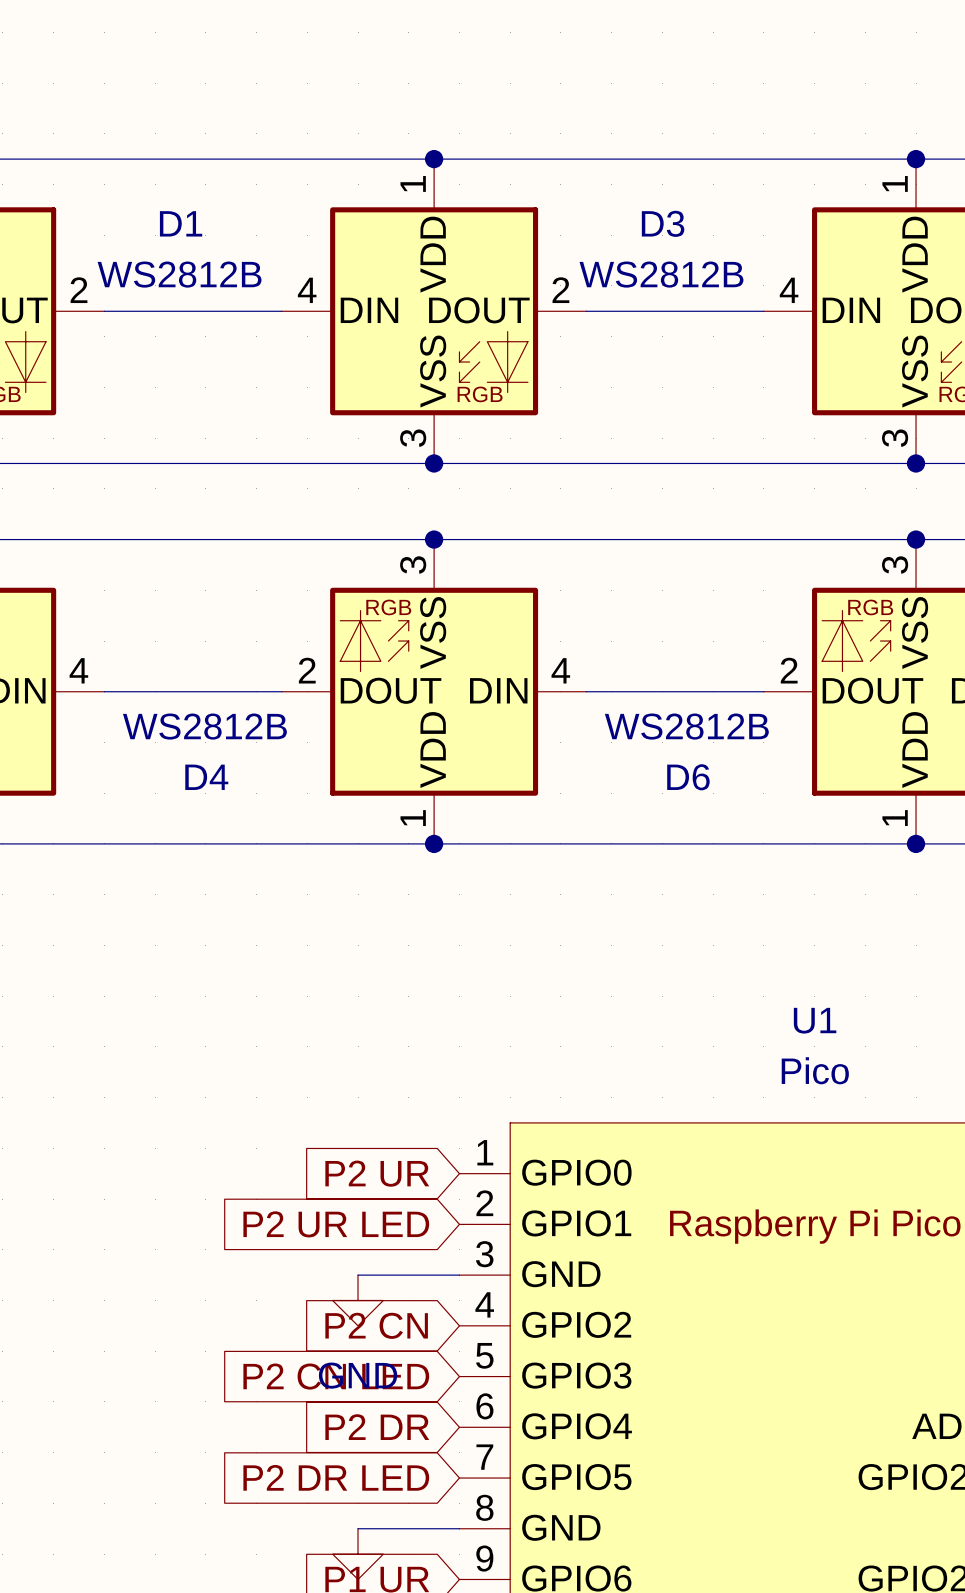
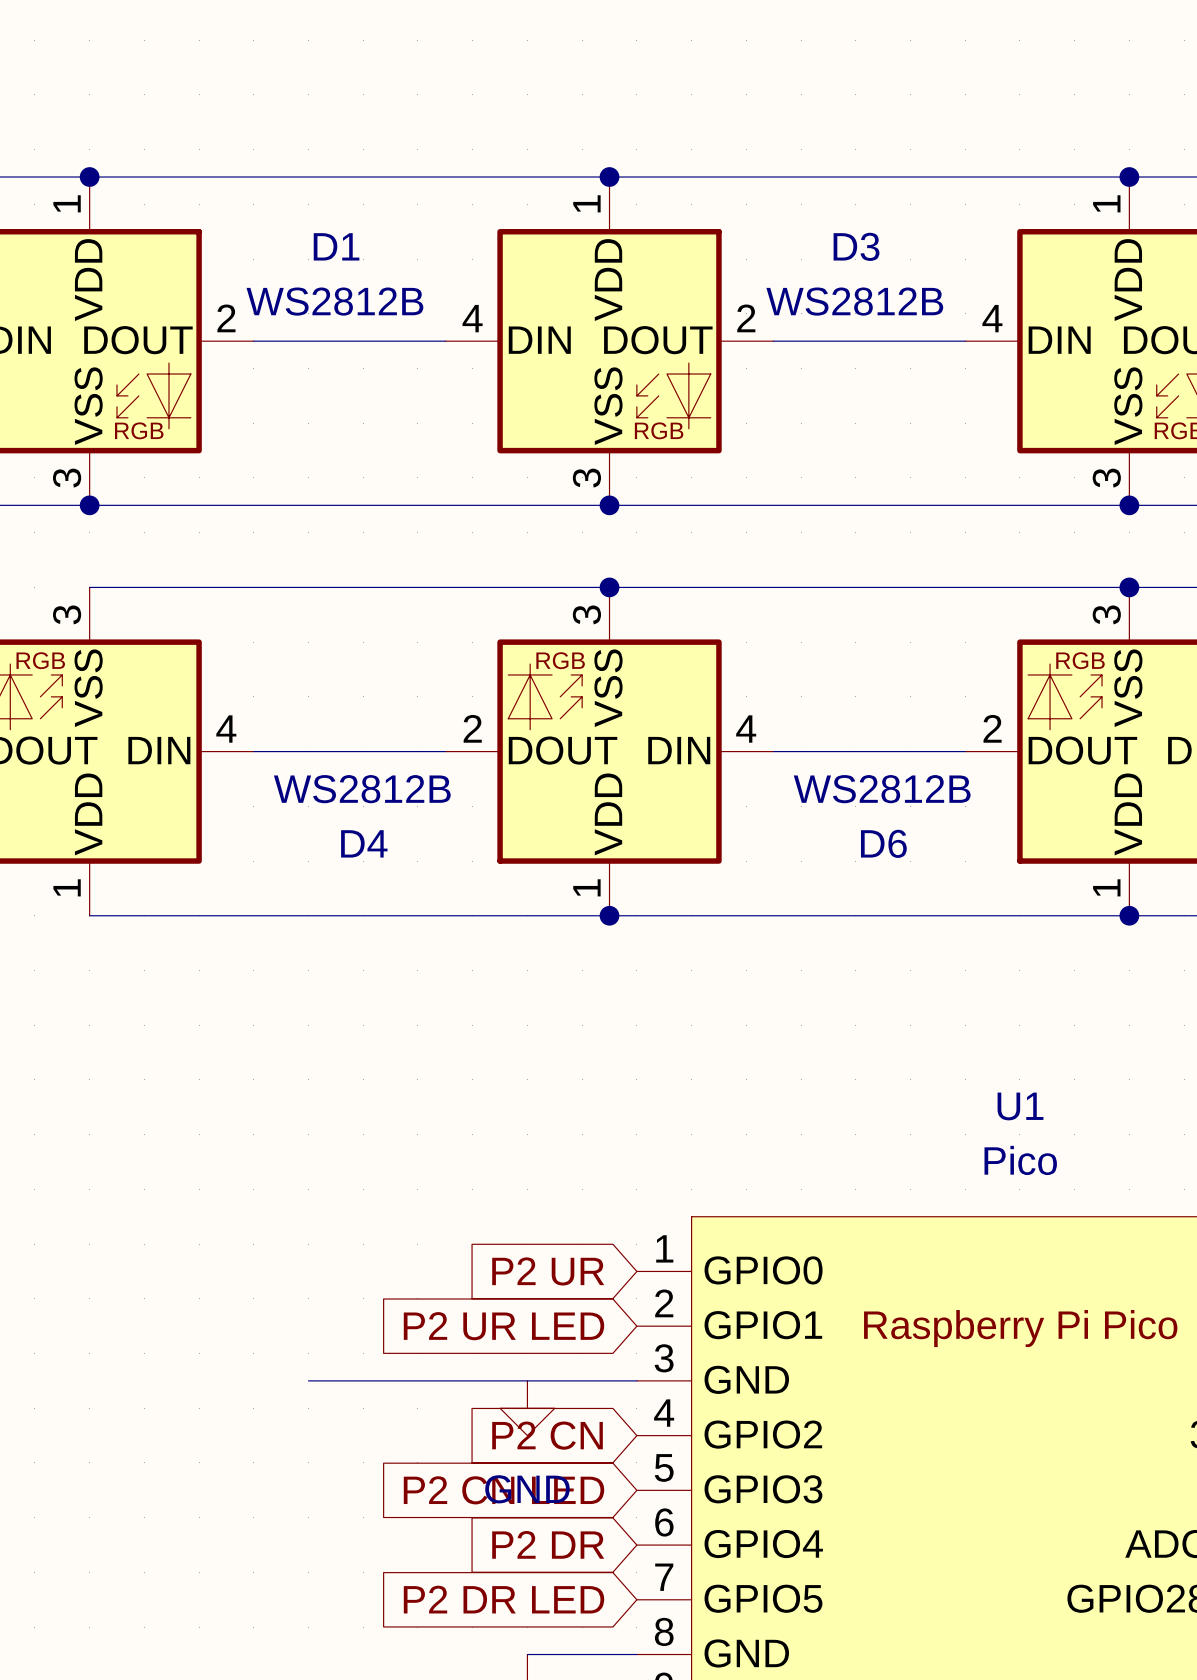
wire: none -> (308, 1380) (527, 1380)

